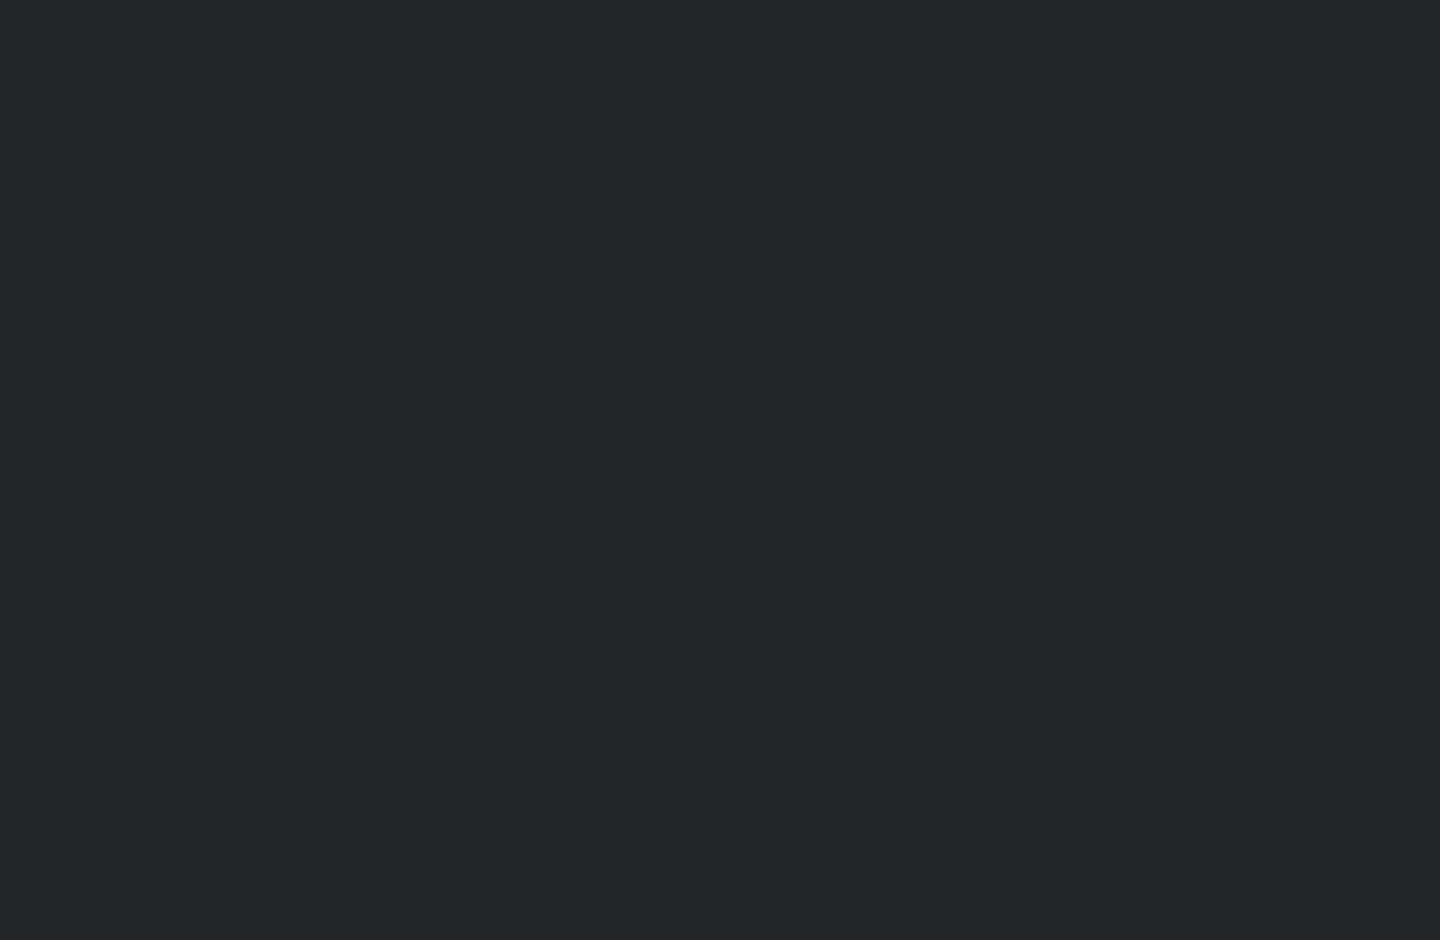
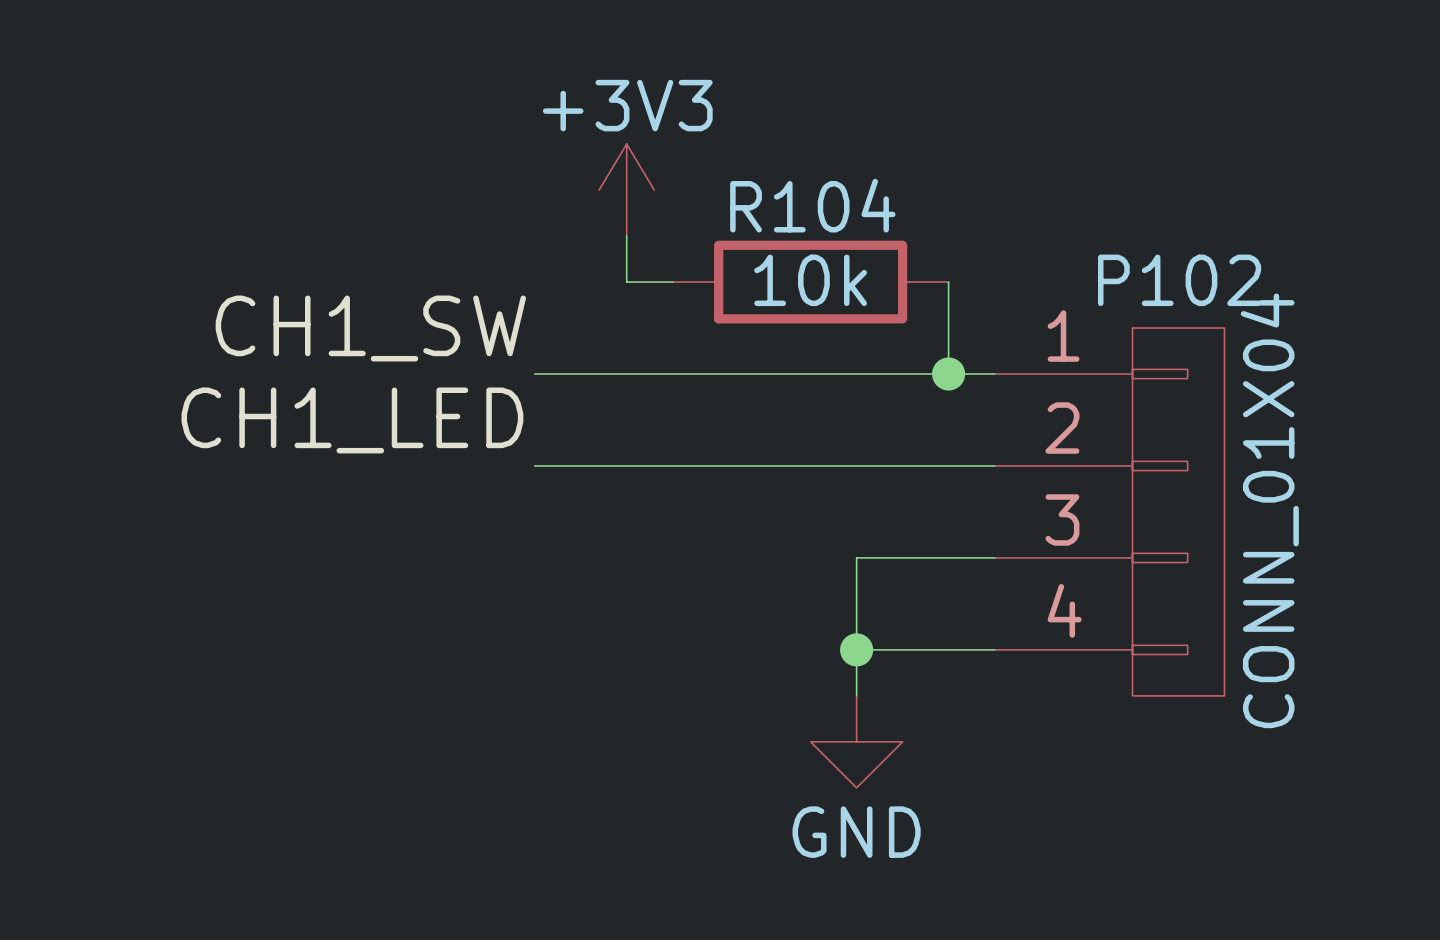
power symbol: none -> +3V3 (626, 190)
wire: none -> (626, 236) (626, 282) (672, 282)
R104: none -> 10k (810, 282)
wire: none -> (948, 282) (948, 374)
label: none -> CH1_SW (370, 328)
wire: none -> (534, 374) (994, 374)
junction: none -> (948, 374)
label: none -> CH1_LED (352, 420)
wire: none -> (534, 465) (994, 465)
P102: none -> CONN_01X04 (1109, 511)
wire: none -> (994, 557) (856, 557) (856, 695)
wire: none -> (856, 649) (994, 649)
junction: none -> (856, 649)
power symbol: none -> GND (856, 741)

